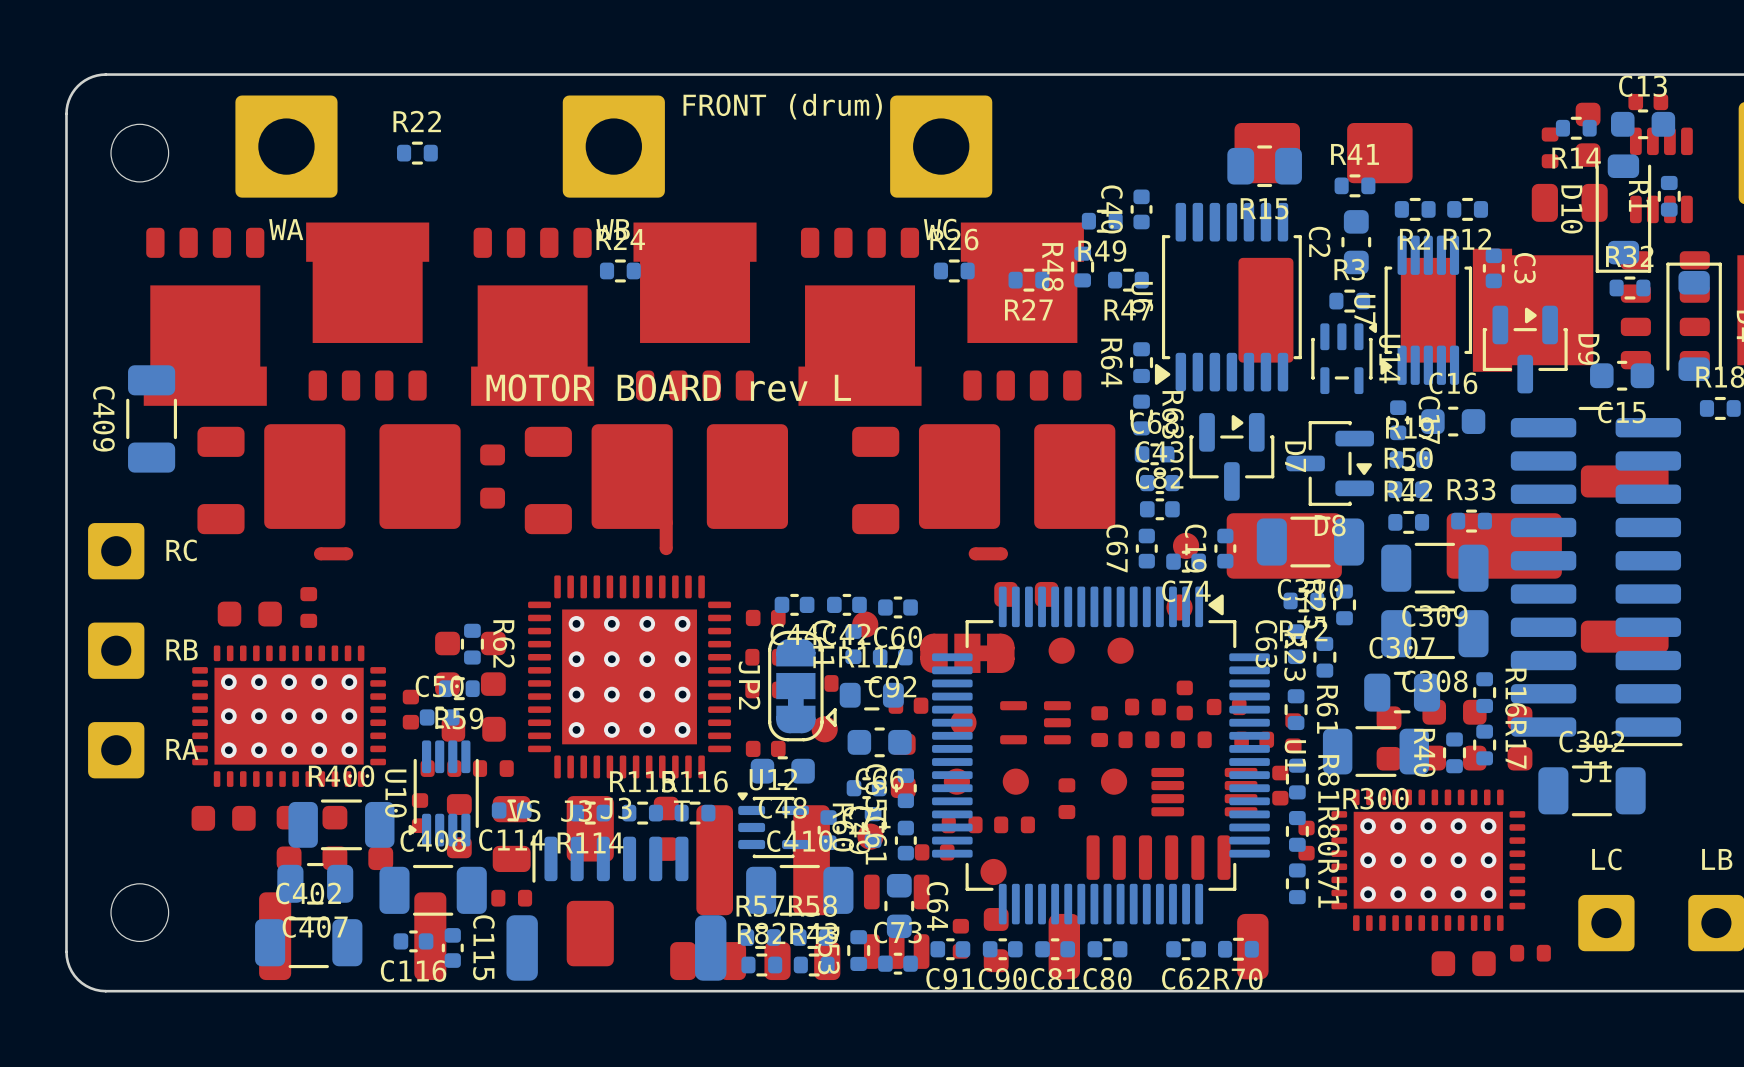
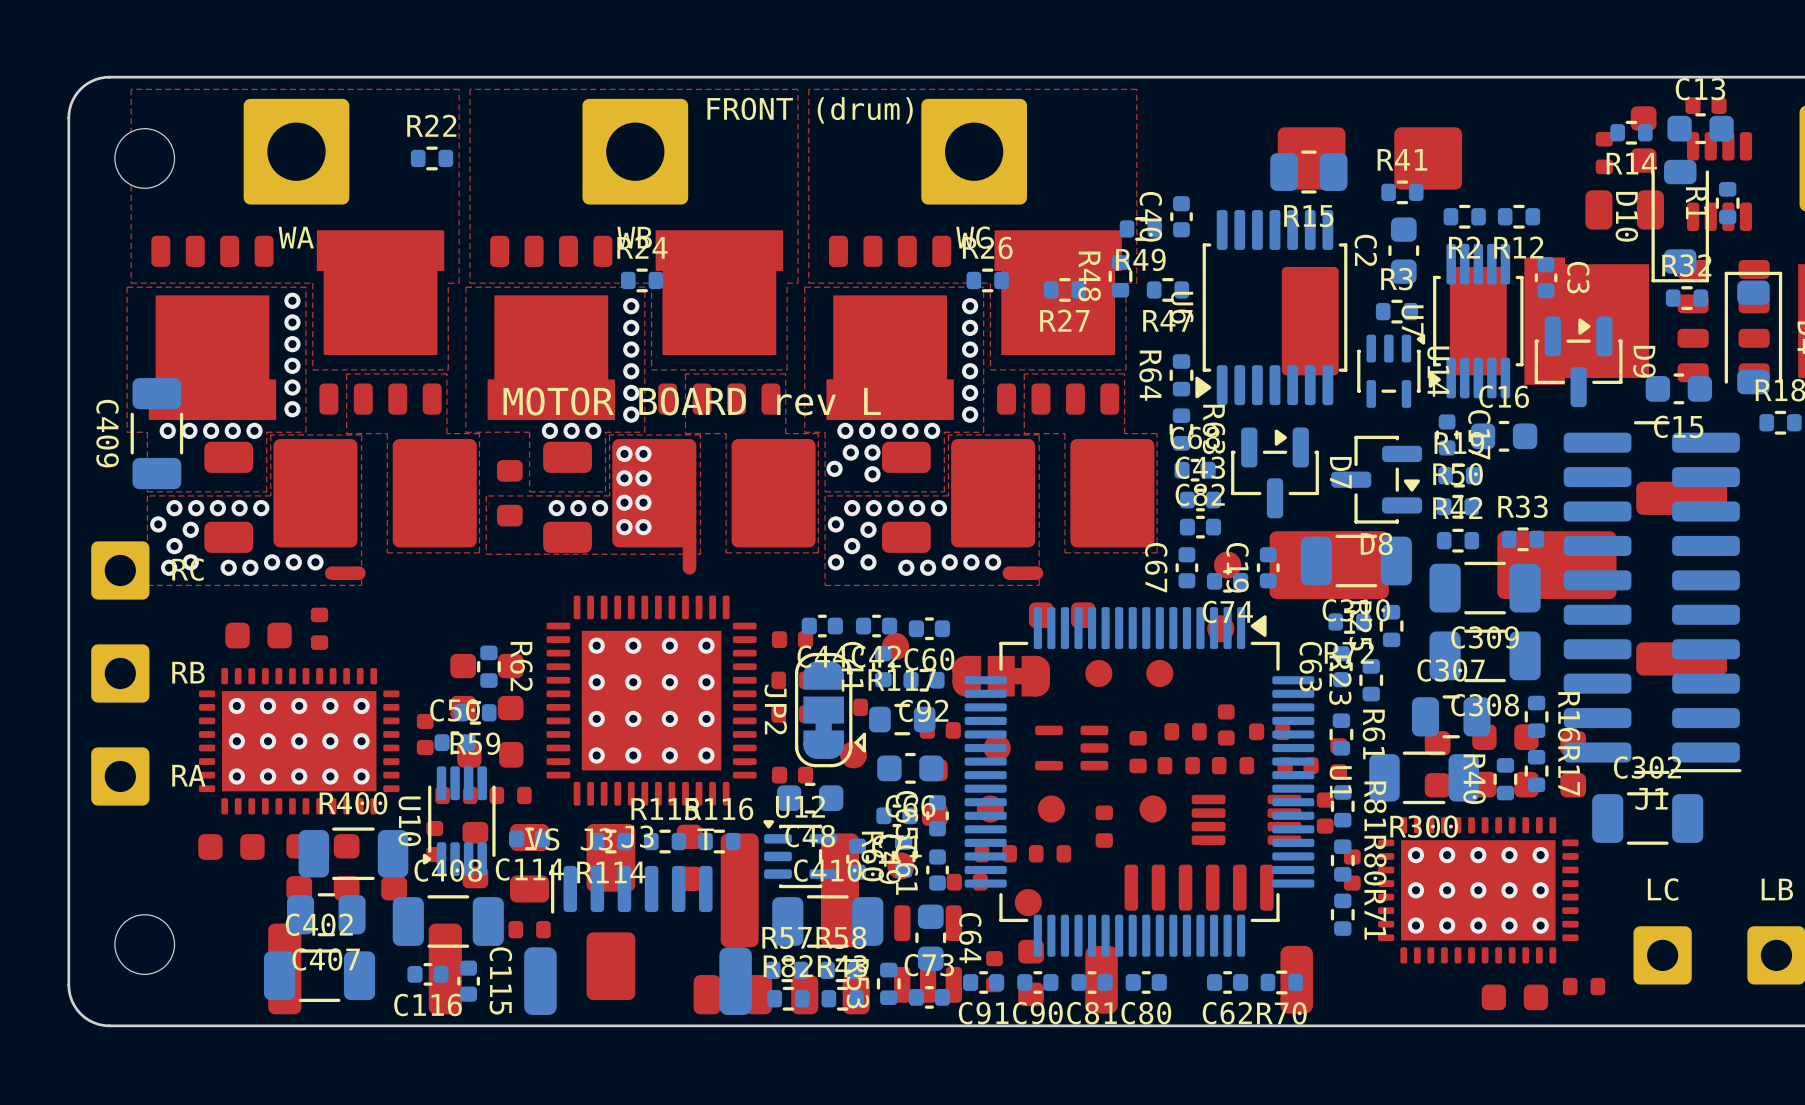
top zone outline: none -> (459, 89) (131, 89) (131, 283) (312, 283) (312, 369) (448, 369) (448, 283) (459, 283) (459, 89)
top zone outline: none -> (797, 89) (469, 89) (469, 283) (651, 283) (651, 369) (787, 369) (787, 283) (797, 283) (797, 89)
top zone outline: none -> (1136, 89) (808, 89) (808, 283) (990, 283) (990, 369) (1125, 369) (1125, 283) (1136, 283) (1136, 89)
top zone outline: none -> (305, 287) (127, 287) (127, 432) (147, 432) (147, 491) (266, 491) (266, 432) (305, 432) (305, 287)
top zone outline: none -> (644, 287) (465, 287) (465, 432) (529, 432) (529, 491) (605, 491) (605, 432) (644, 432) (644, 287)
top zone outline: none -> (983, 287) (804, 287) (804, 432) (825, 432) (825, 491) (944, 491) (944, 432) (983, 432) (983, 287)
via: none -> (292, 300)
via: none -> (631, 306)
via: none -> (970, 306)
via: none -> (292, 322)
via: none -> (631, 327)
via: none -> (970, 327)
via: none -> (292, 344)
via: none -> (631, 349)
via: none -> (970, 349)
via: none -> (292, 365)
via: none -> (631, 371)
via: none -> (970, 371)
top zone outline: none -> (446, 373) (346, 373) (346, 433) (387, 433) (387, 552) (479, 552) (479, 433) (446, 433) (446, 373)
top zone outline: none -> (785, 373) (685, 373) (685, 433) (726, 433) (726, 552) (818, 552) (818, 433) (785, 433) (785, 373)
top zone outline: none -> (1124, 373) (1024, 373) (1024, 433) (1064, 433) (1064, 552) (1157, 552) (1157, 433) (1124, 433) (1124, 373)
via: none -> (292, 387)
via: none -> (631, 392)
via: none -> (970, 392)
via: none -> (292, 409)
via: none -> (631, 414)
via: none -> (970, 414)
via: none -> (167, 430)
via: none -> (189, 430)
via: none -> (211, 430)
via: none -> (232, 430)
via: none -> (254, 430)
via: none -> (549, 430)
via: none -> (571, 430)
via: none -> (593, 430)
via: none -> (845, 430)
via: none -> (867, 430)
via: none -> (888, 430)
via: none -> (910, 430)
via: none -> (932, 430)
top zone outline: none -> (361, 434) (270, 434) (270, 495) (147, 495) (147, 585) (361, 585) (361, 434)
top zone outline: none -> (700, 434) (609, 434) (609, 495) (486, 495) (486, 554) (700, 554) (700, 434)
top zone outline: none -> (1039, 434) (948, 434) (948, 495) (825, 495) (825, 585) (1039, 585) (1039, 434)
via: none -> (850, 452)
via: none -> (872, 452)
via: none -> (624, 453)
via: none -> (643, 453)
via: none -> (834, 468)
via: none -> (872, 474)
via: none -> (624, 478)
via: none -> (643, 478)
via: none -> (624, 502)
via: none -> (643, 502)
via: none -> (174, 508)
via: none -> (196, 508)
via: none -> (217, 508)
via: none -> (239, 508)
via: none -> (261, 508)
via: none -> (556, 508)
via: none -> (578, 508)
via: none -> (600, 508)
via: none -> (852, 508)
via: none -> (873, 508)
via: none -> (895, 508)
via: none -> (917, 508)
via: none -> (938, 508)
via: none -> (158, 524)
via: none -> (835, 524)
via: none -> (624, 527)
via: none -> (643, 527)
via: none -> (190, 529)
via: none -> (868, 529)
via: none -> (174, 546)
via: none -> (852, 546)
via: none -> (190, 562)
via: none -> (272, 562)
via: none -> (293, 562)
via: none -> (315, 562)
via: none -> (835, 562)
via: none -> (868, 562)
via: none -> (949, 562)
via: none -> (971, 562)
via: none -> (993, 562)
via: none -> (169, 567)
via: none -> (228, 567)
via: none -> (250, 567)
via: none -> (906, 567)
via: none -> (928, 567)

